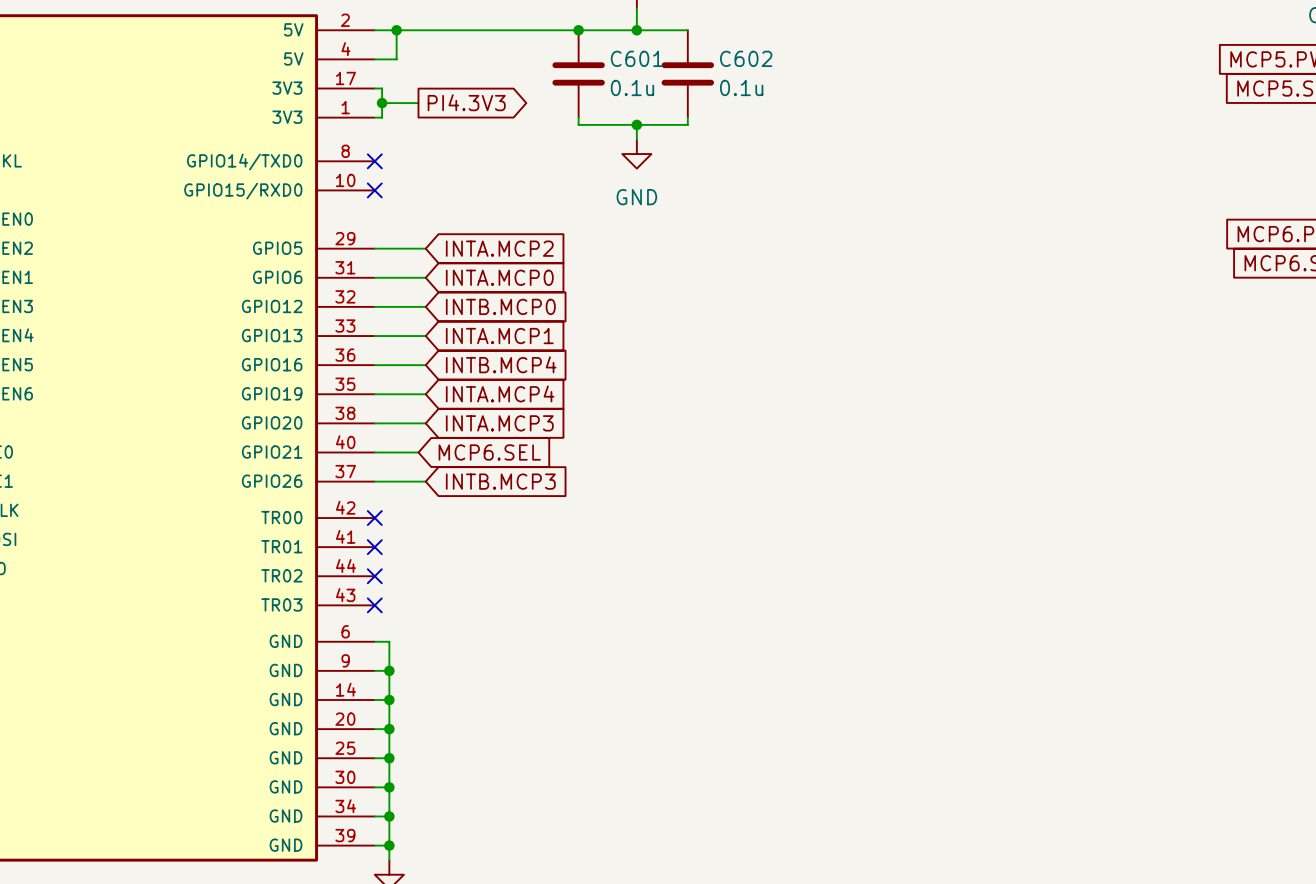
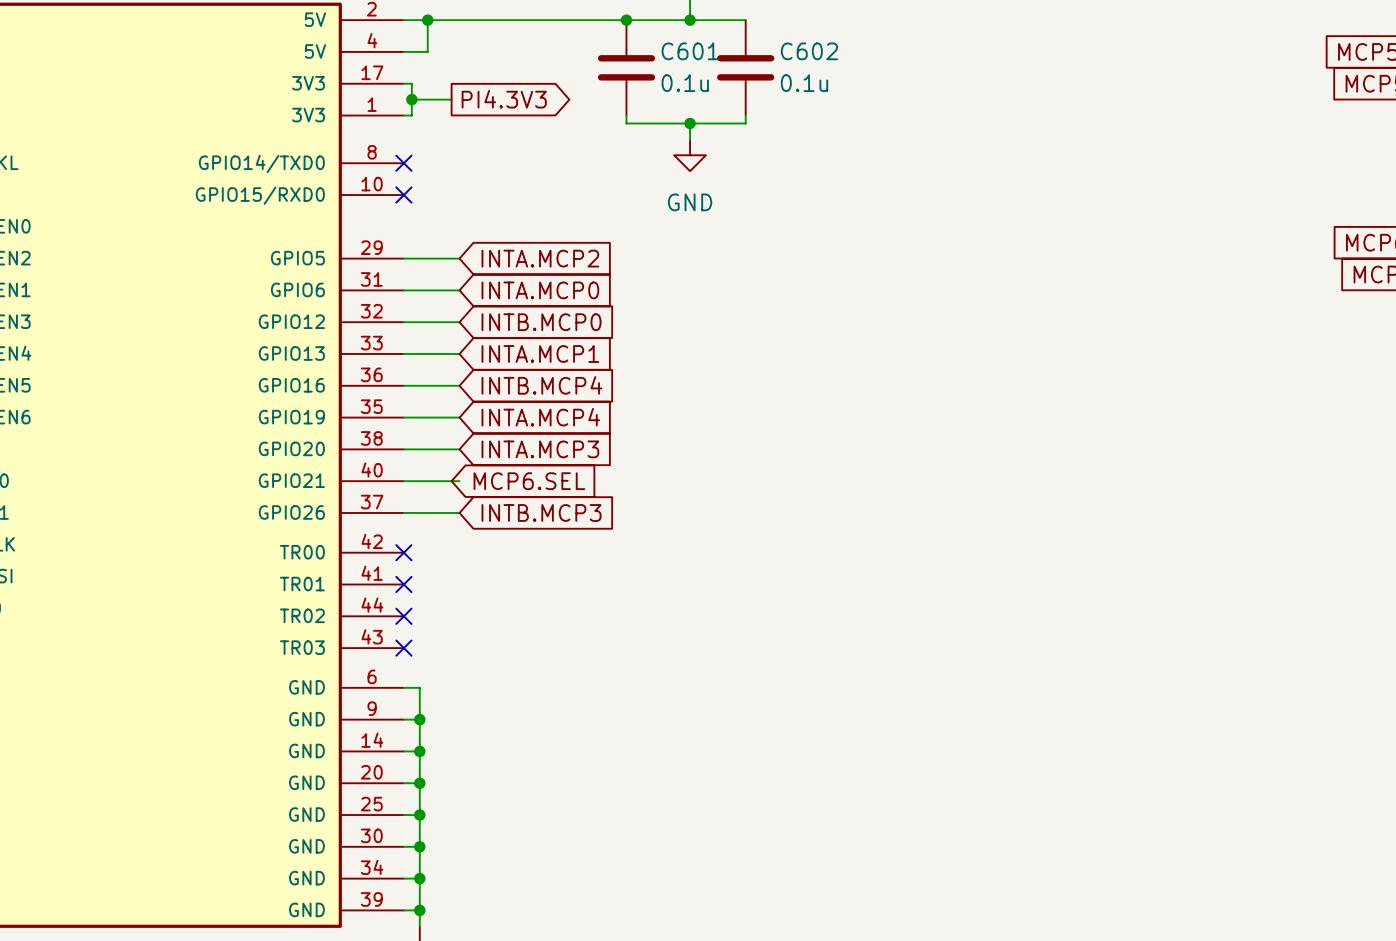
wire: none -> (451, 481) (459, 481)

